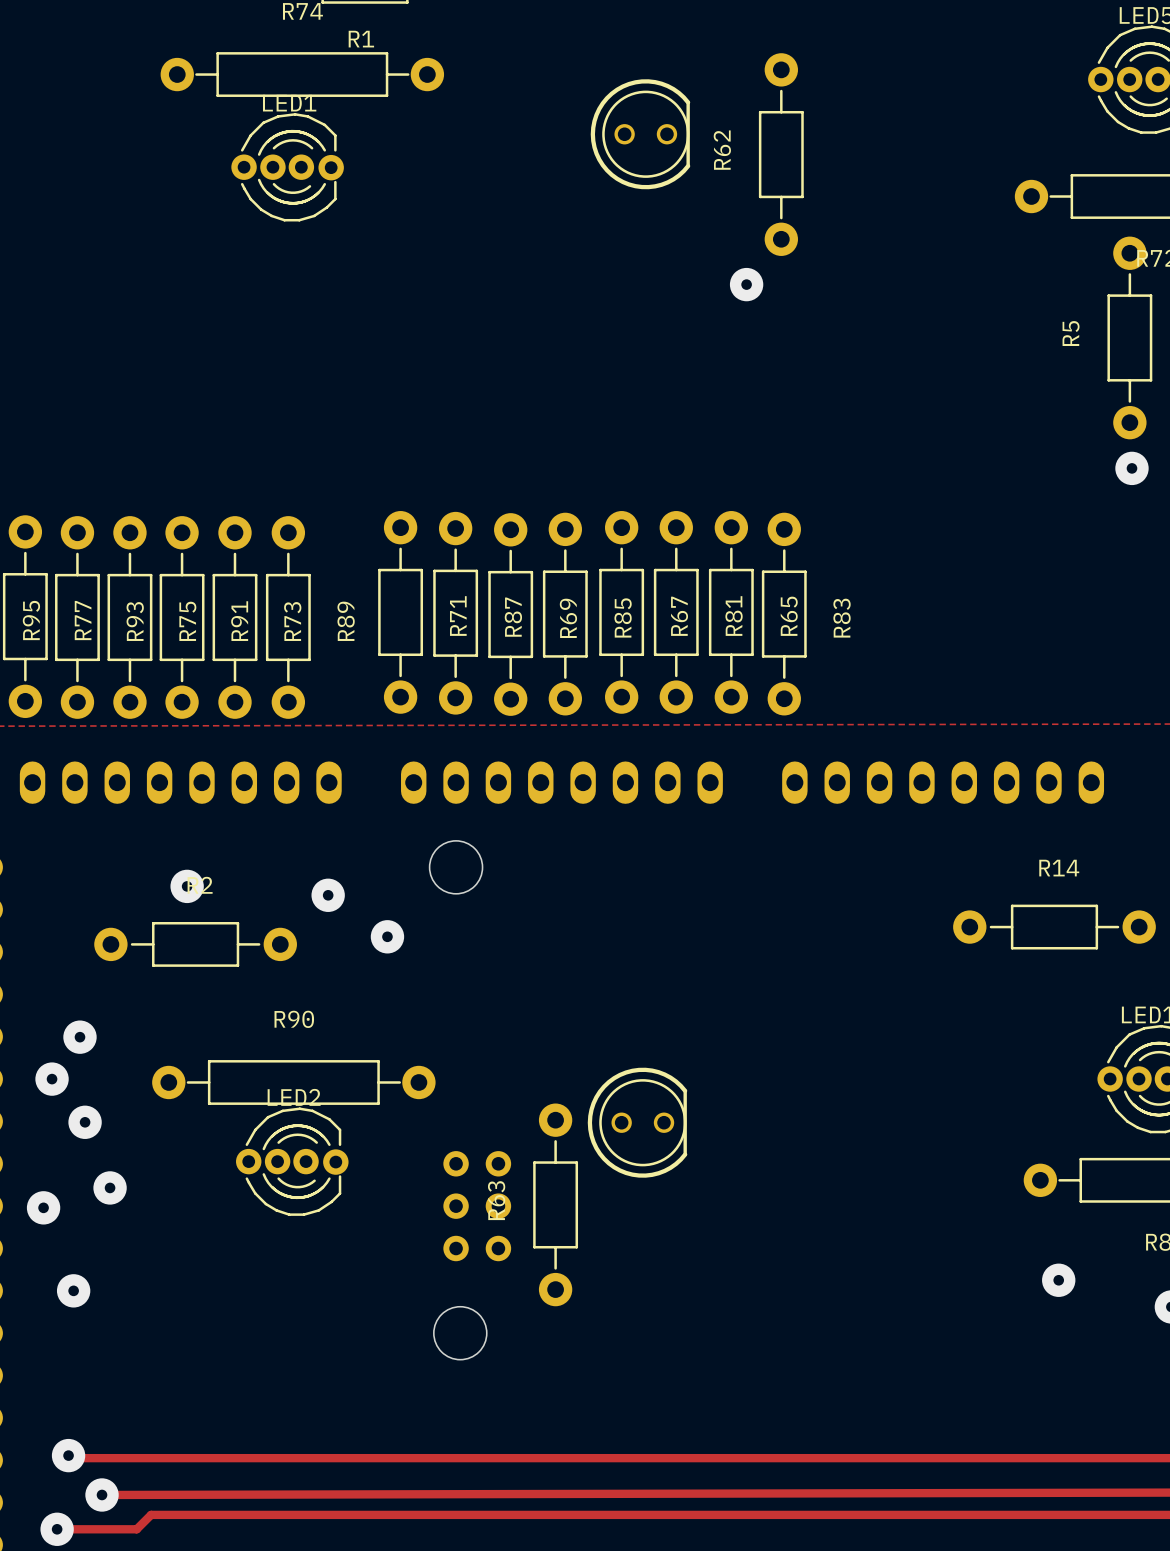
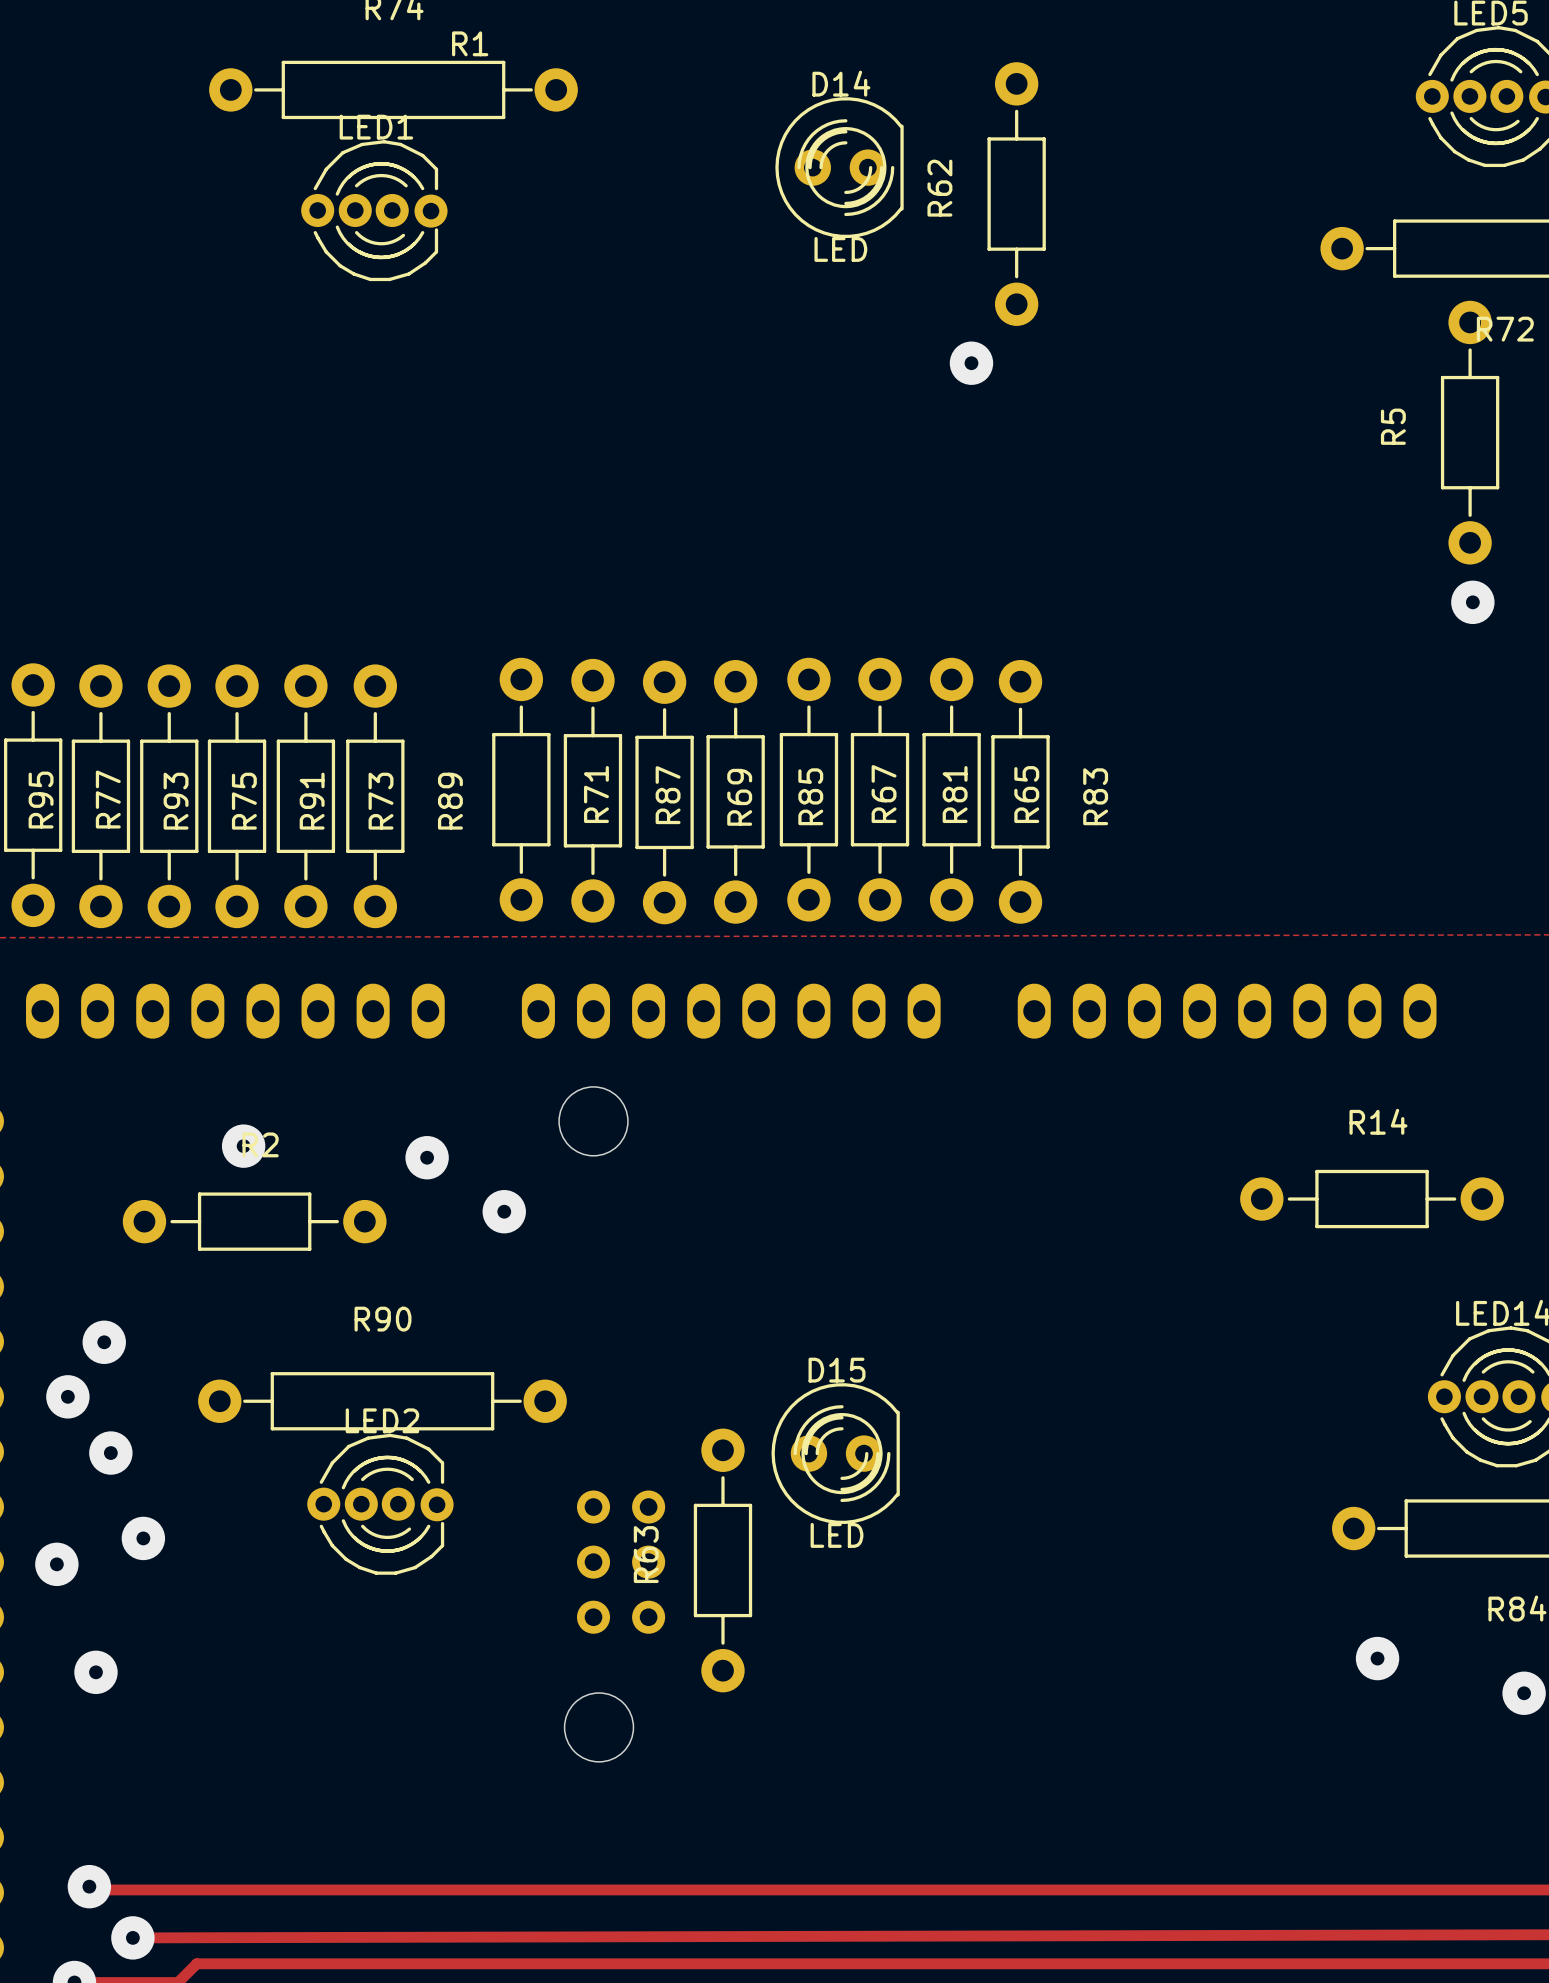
part: (640, 134) -> none
D14: none -> LED (839, 167)
part: (637, 1122) -> none
D15: none -> LED (835, 1453)

